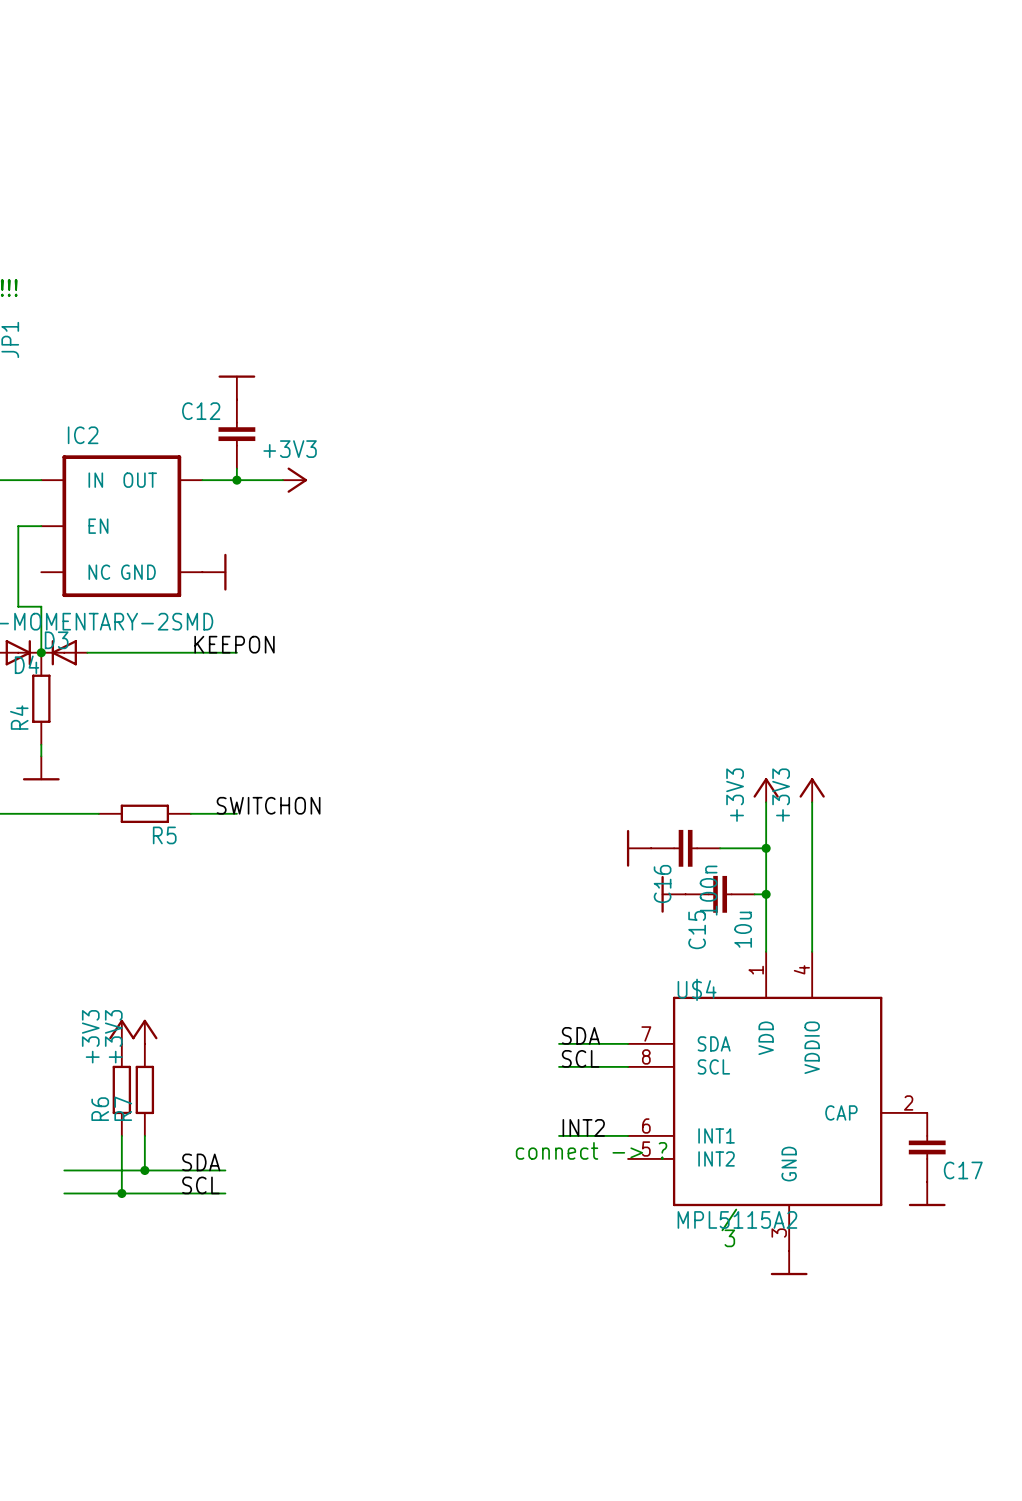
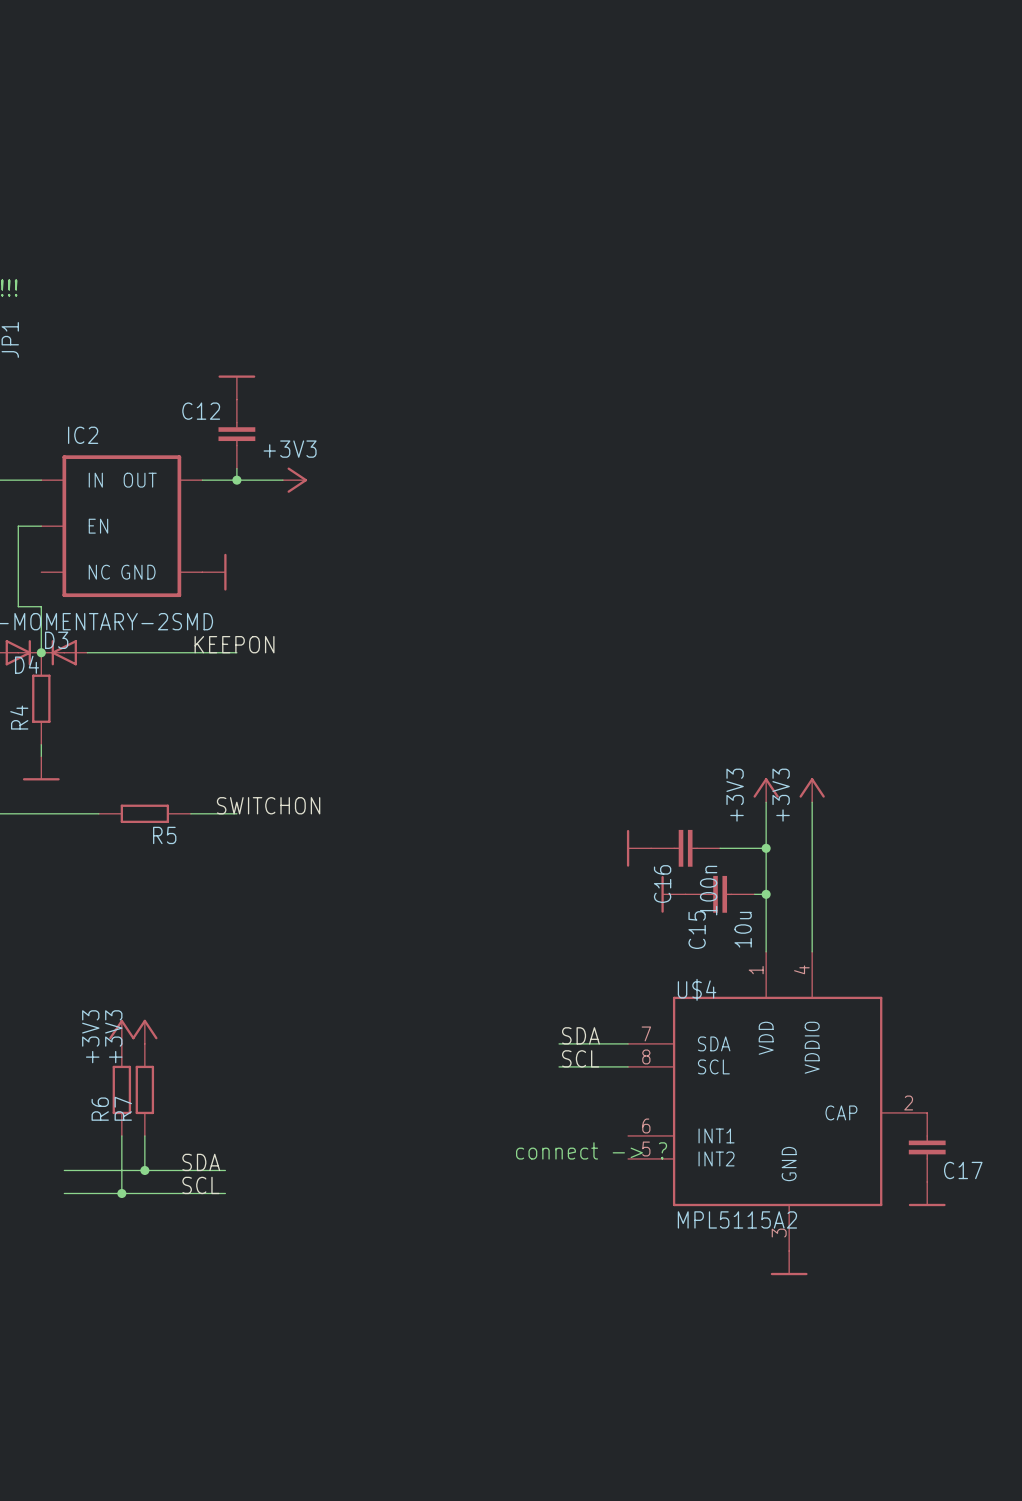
label: INT2 (583, 1127) -> none
wire: (559, 1135) (628, 1135) -> none
wire: (736, 1209) (722, 1230) -> none
text: 3 (729, 1238) -> none

